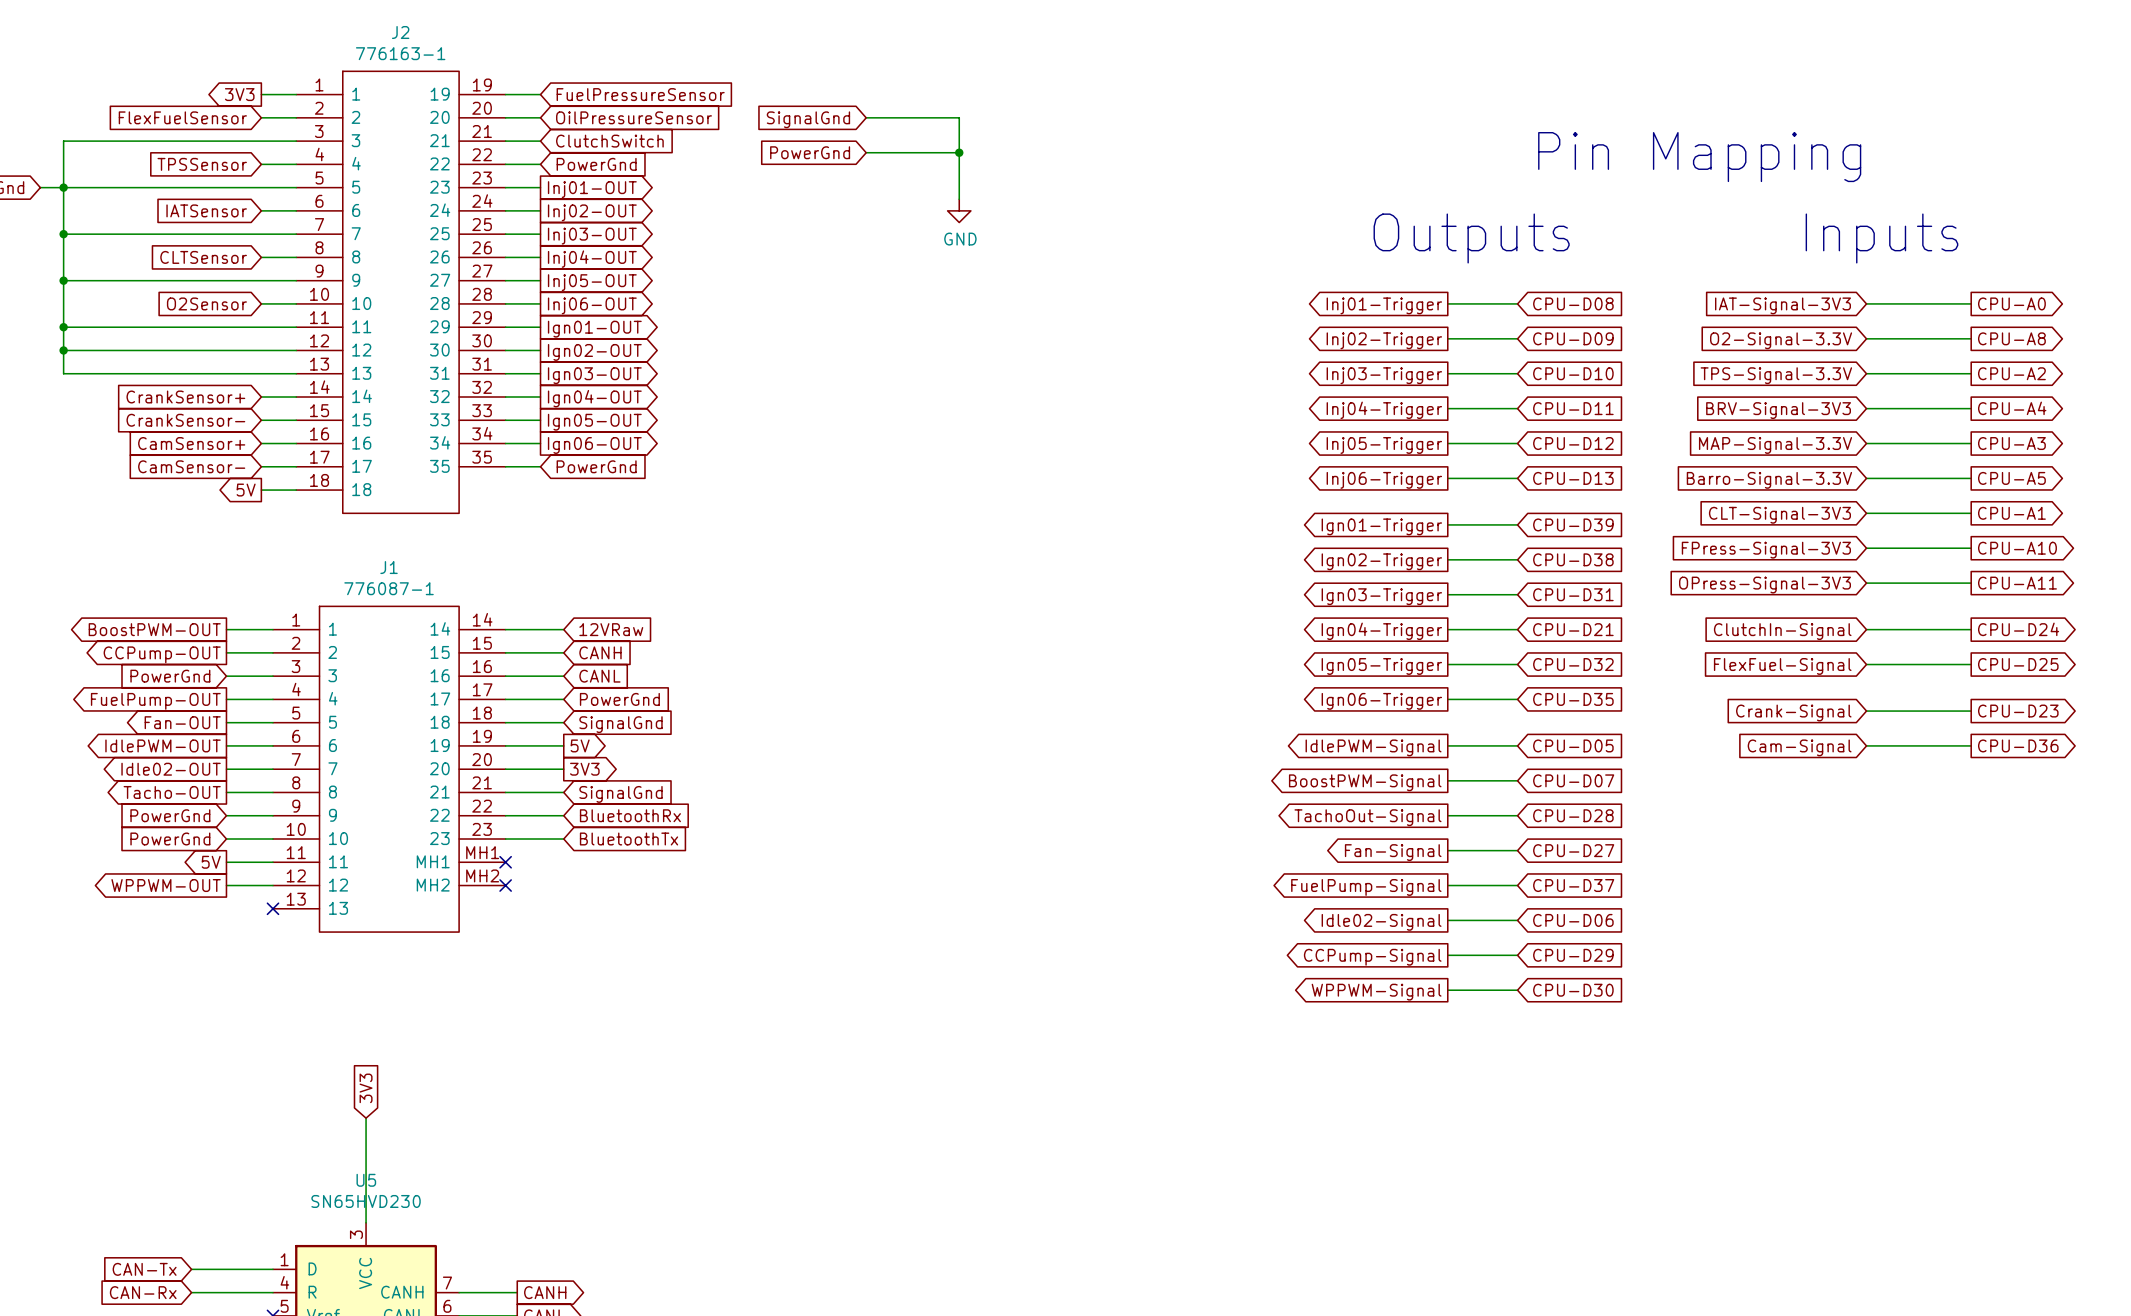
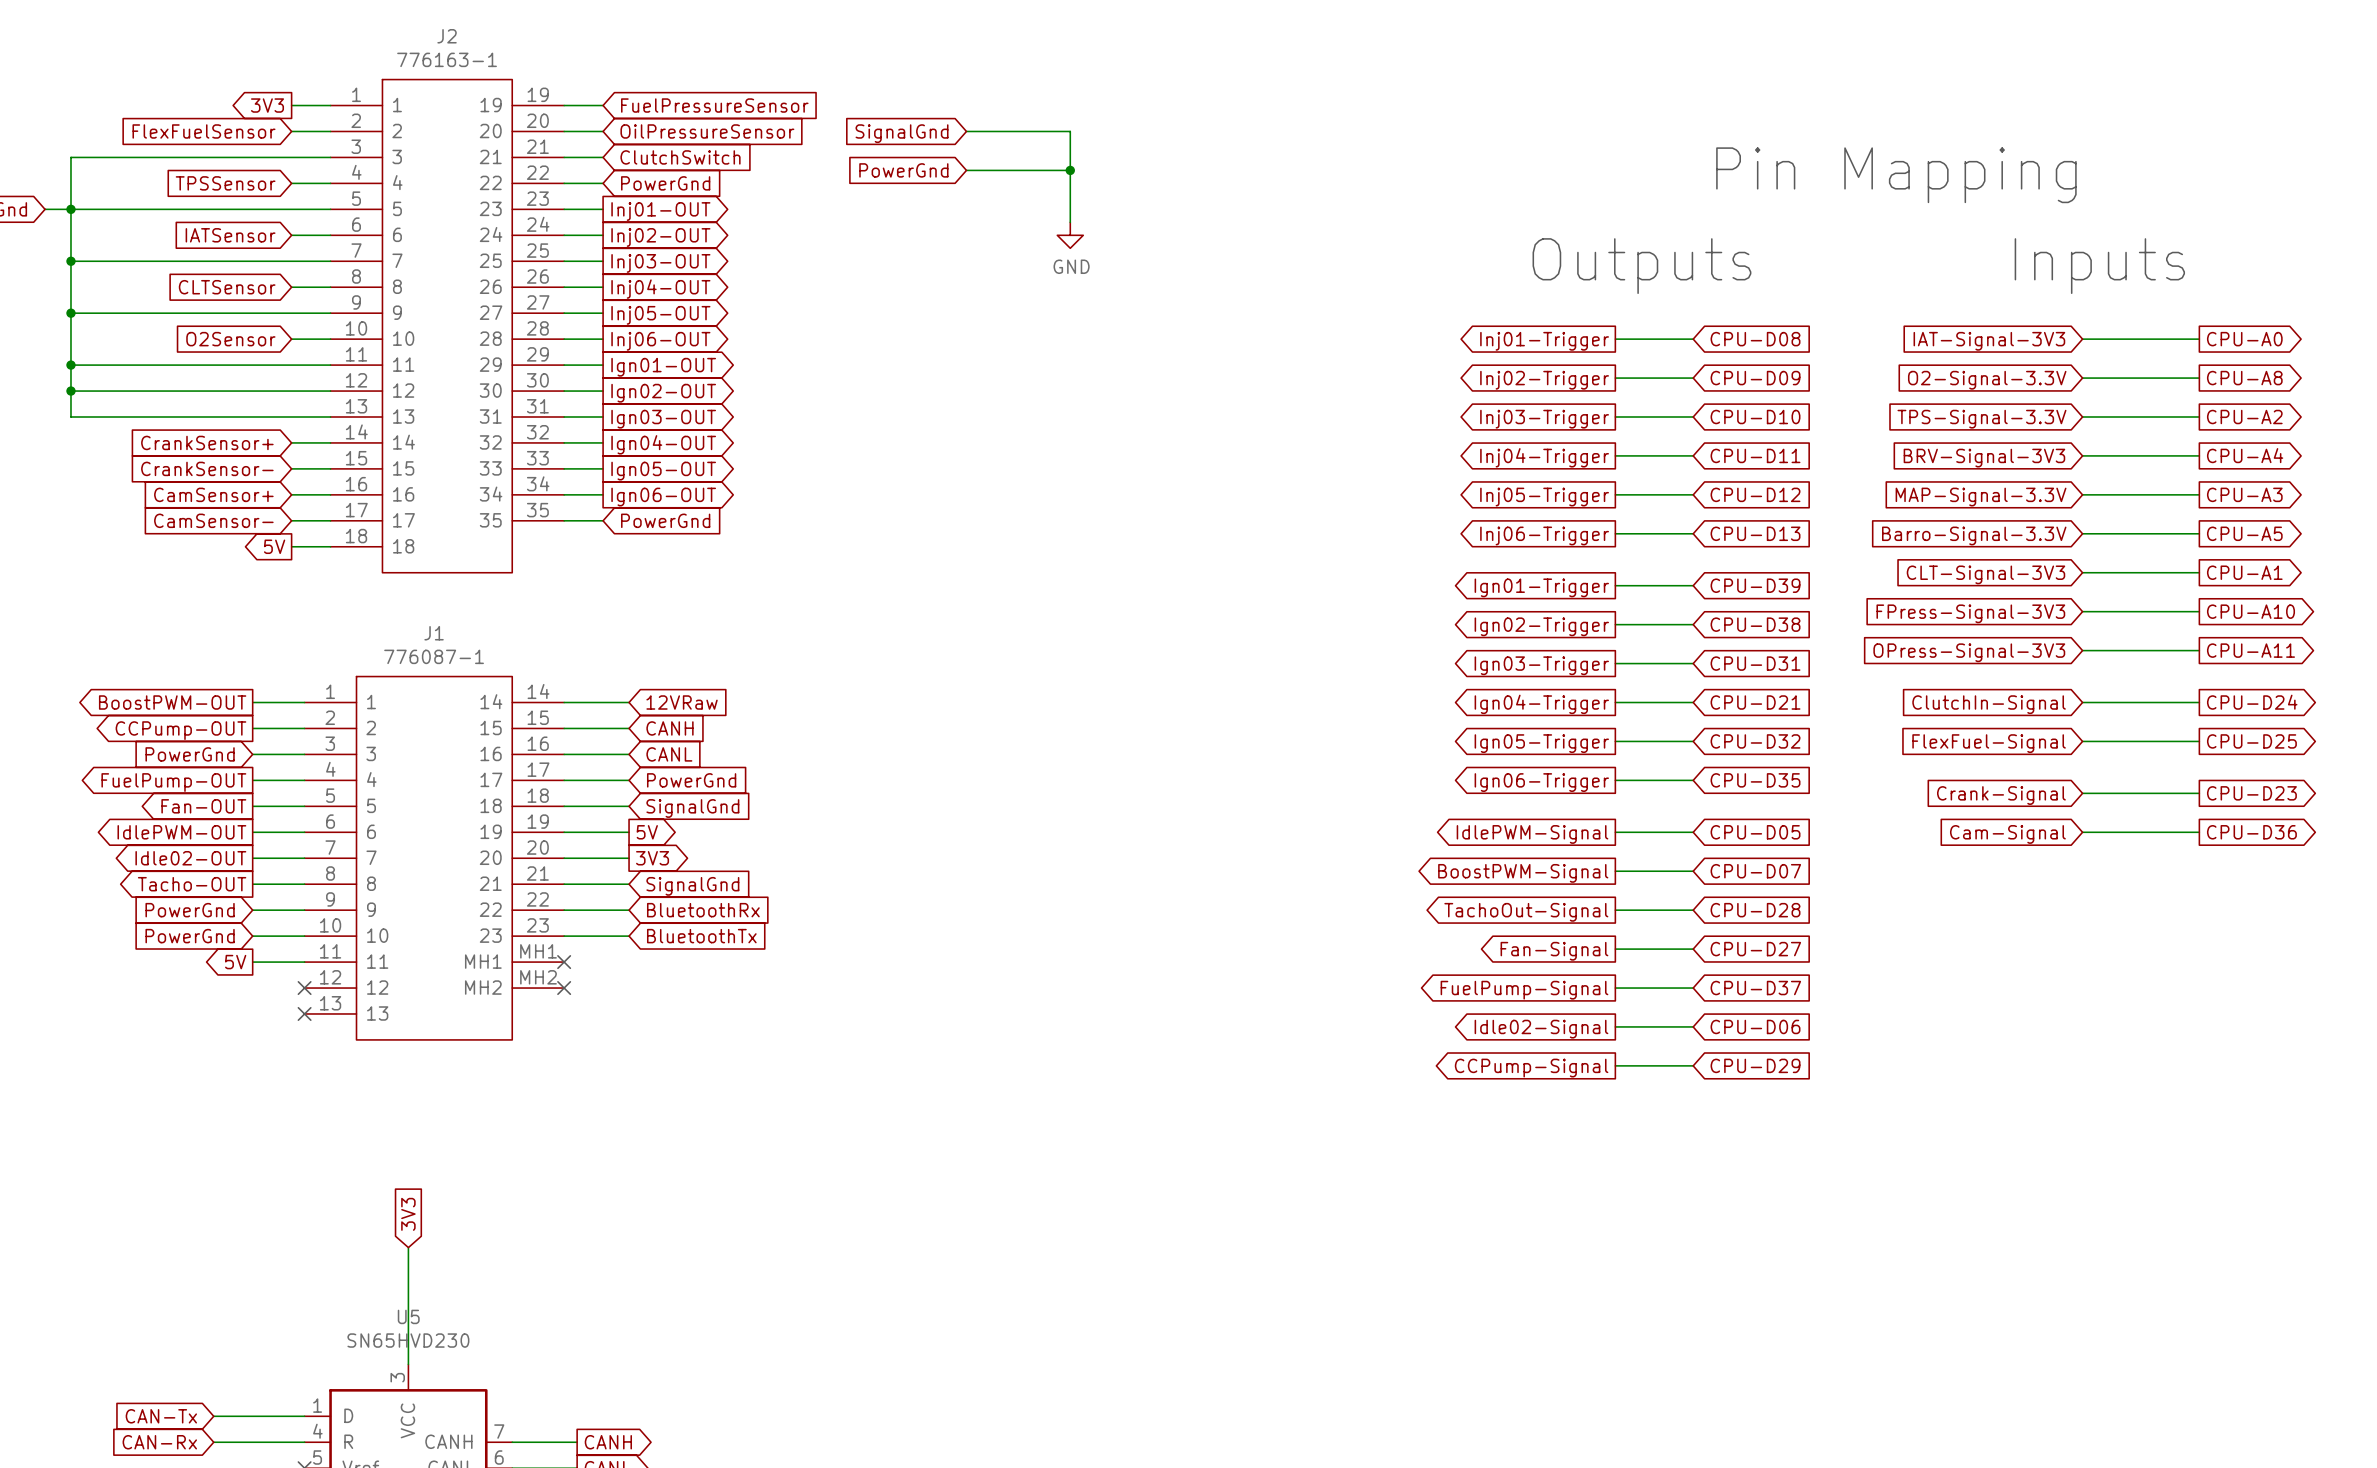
global label: WPPWM-OUT (166, 885) -> none
wire: (226, 885) (272, 885) -> none
no-connect mark: none -> (304, 988)
wire: (1447, 990) (1517, 990) -> none
global label: CPU-D30 (1573, 990) -> none
global label: WPPWM-Signal (1376, 992) -> none

